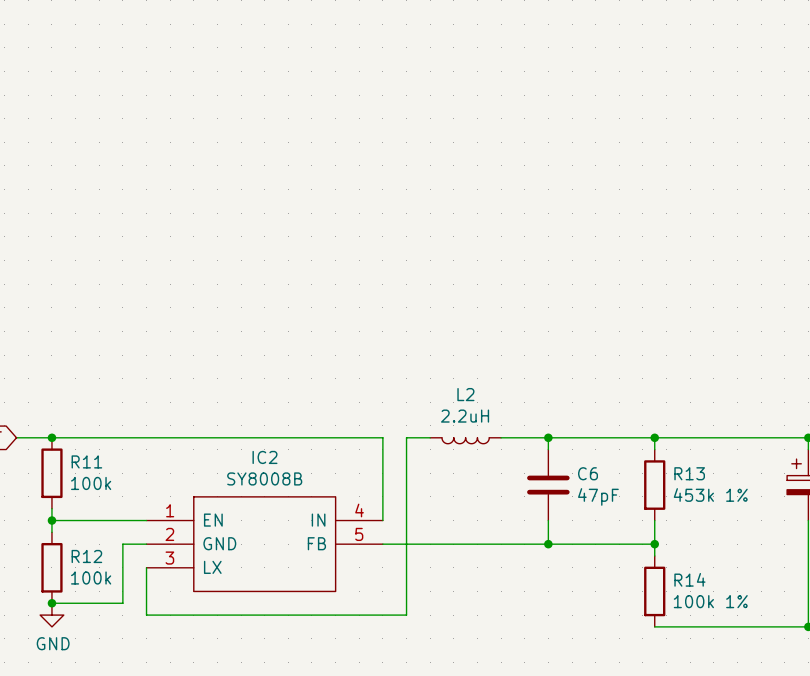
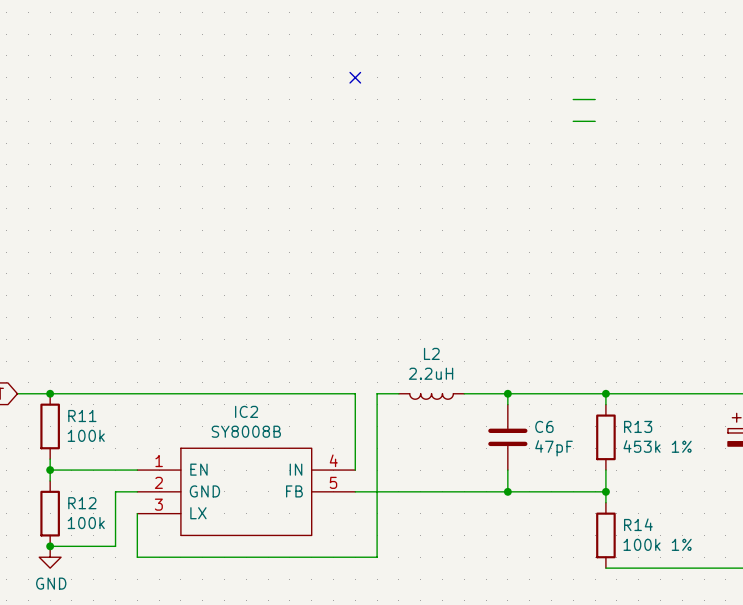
no-connect mark: none -> (355, 77)
wire: none -> (573, 99) (595, 99)
wire: none -> (573, 121) (595, 121)

